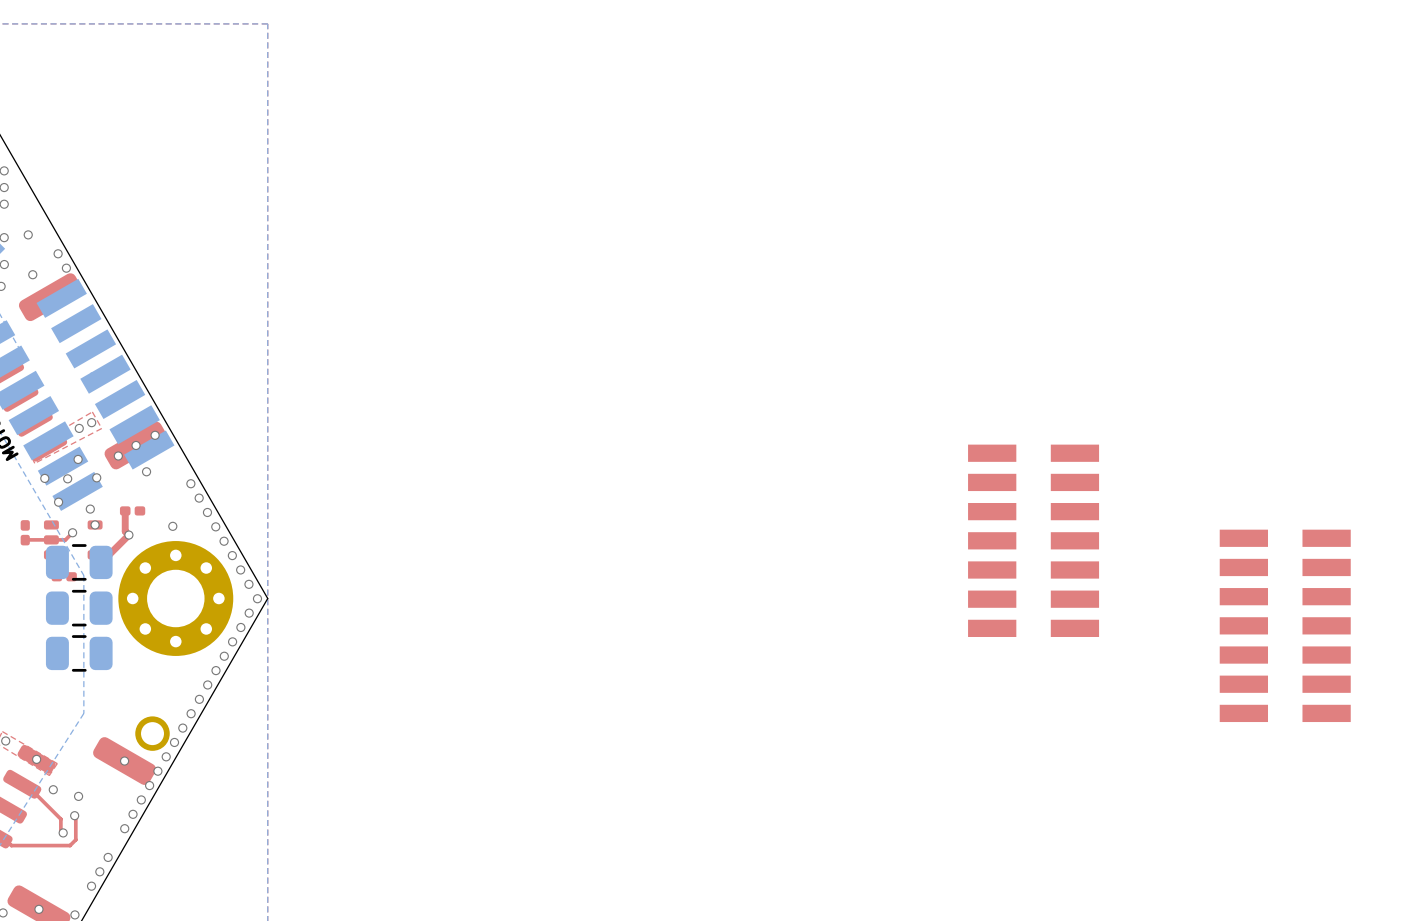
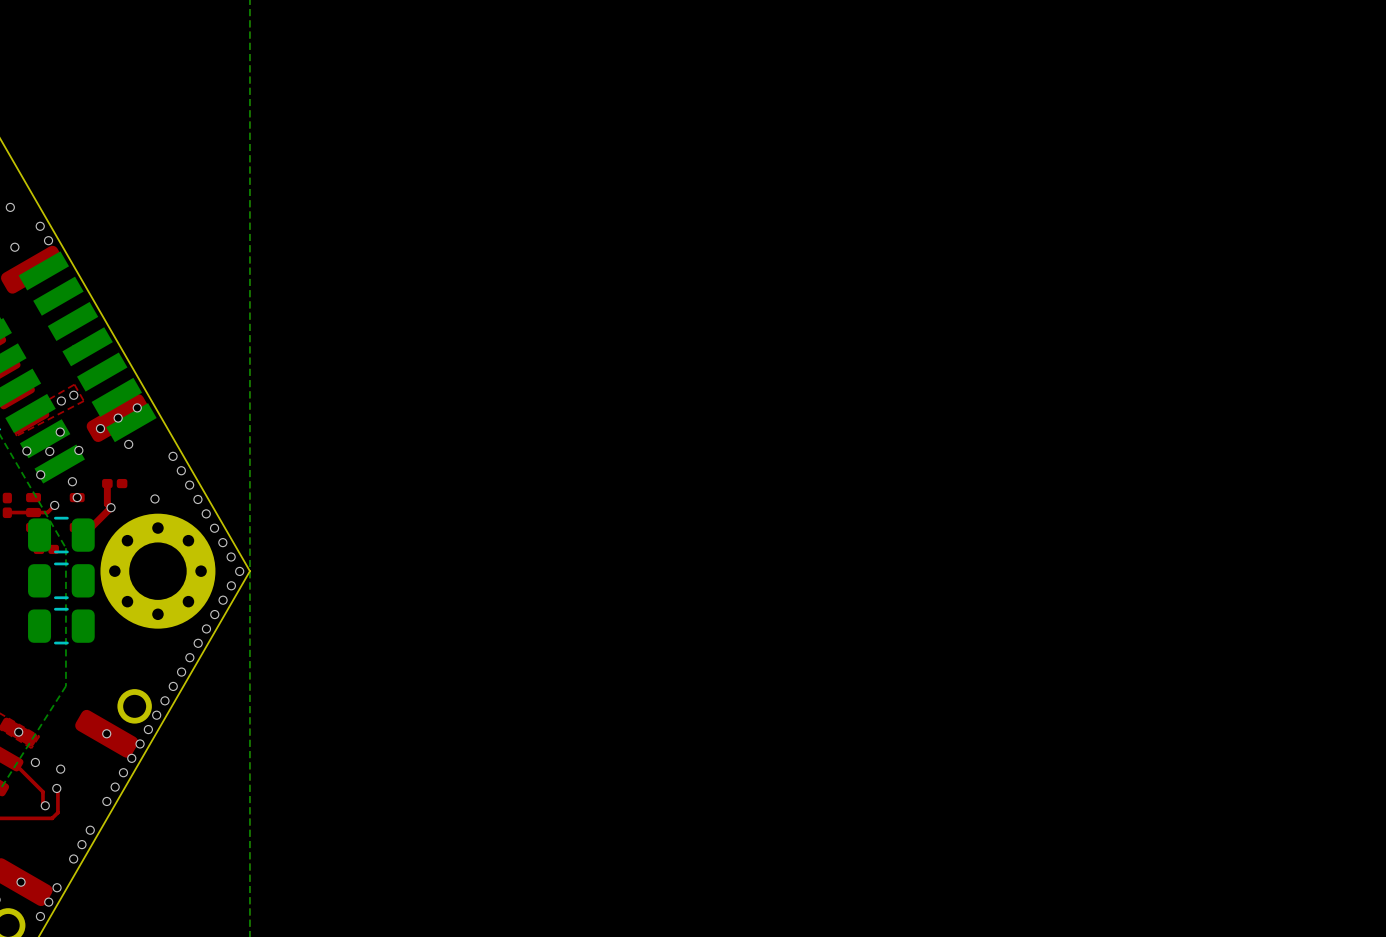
part: (1033, 540) -> none
part: (1285, 625) -> none

